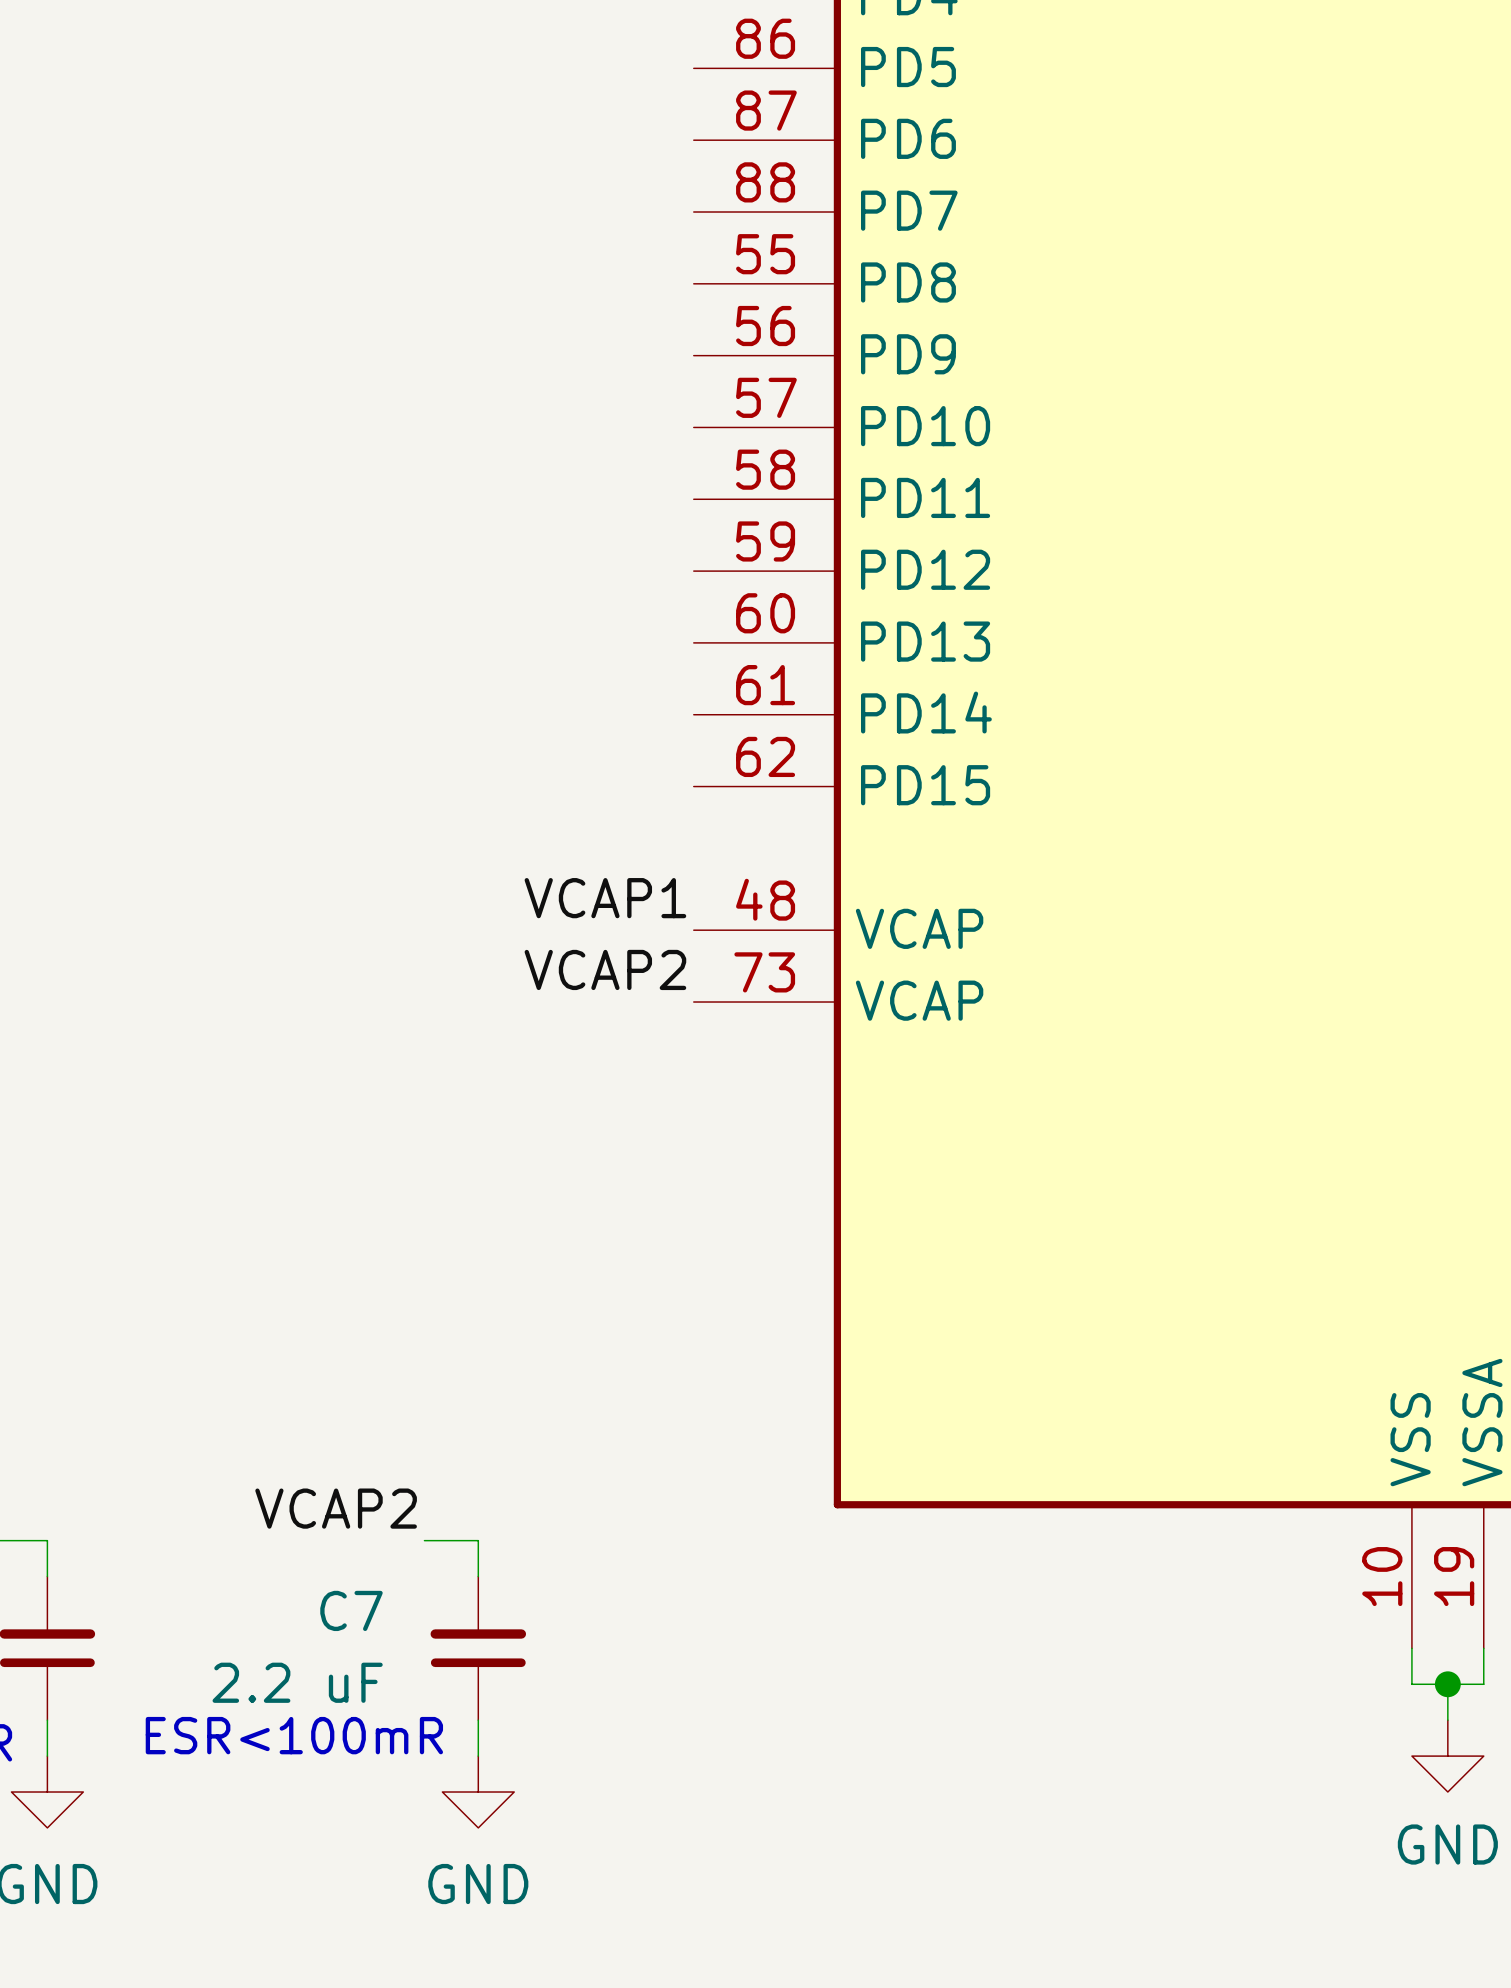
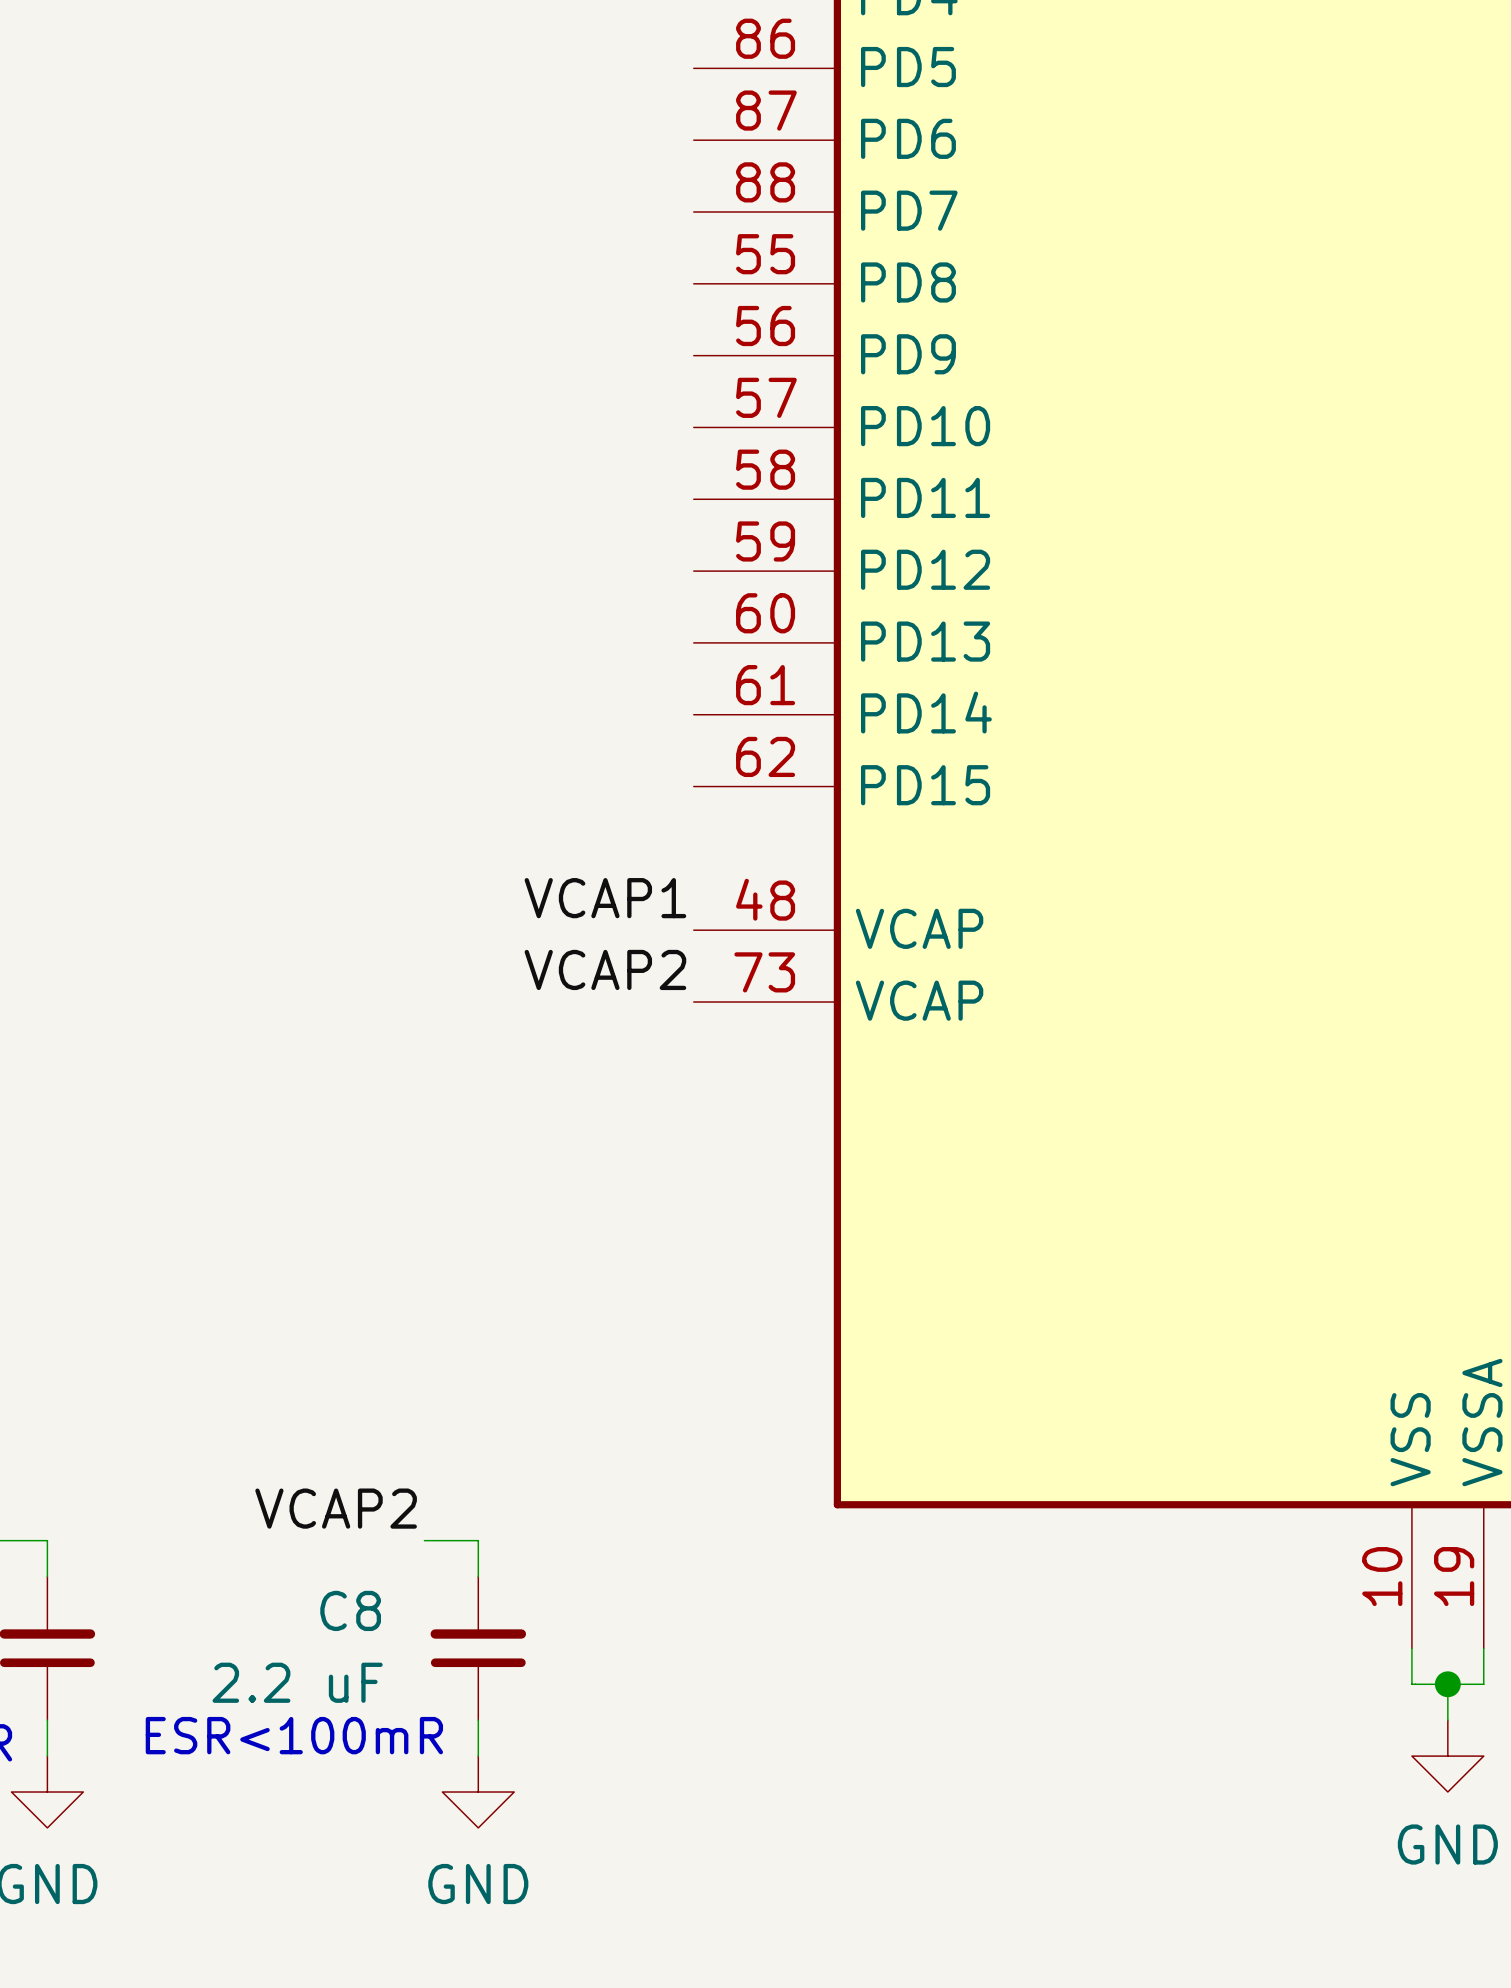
C7 name: C7 (351, 1610) -> C8 (350, 1610)

